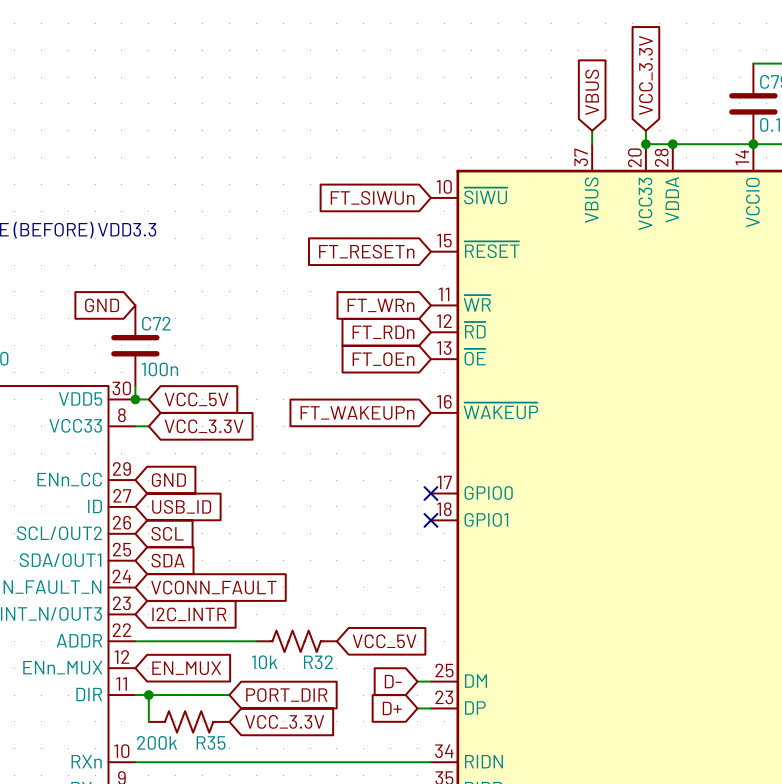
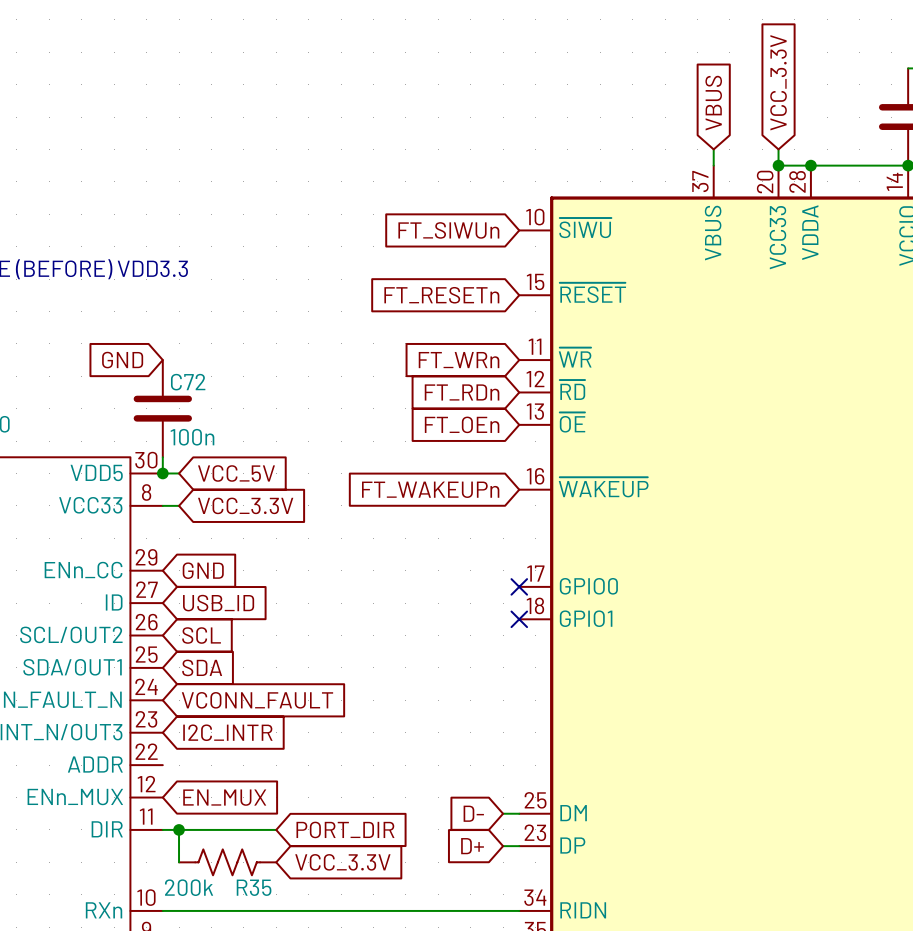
wire: (135, 641) (256, 641) -> none
R32: 10k (296, 641) -> none
global label: VCC_5V (384, 641) -> none

